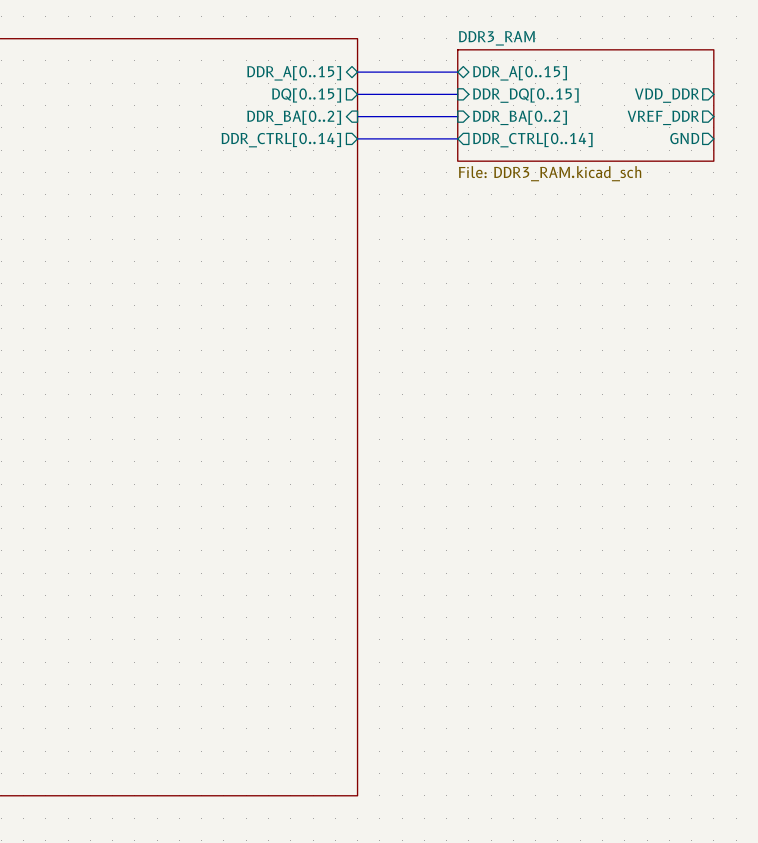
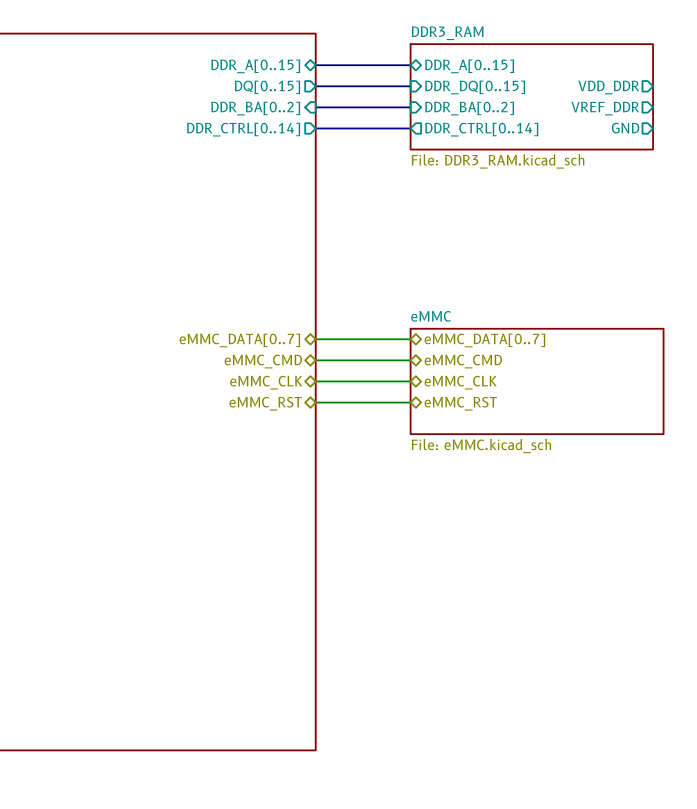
wire: none -> (315, 339) (410, 339)
hierarchical label: none -> eMMC_DATA[0..7] (239, 340)
hierarchical label: none -> eMMC_DATA[0..7] (485, 340)
wire: none -> (315, 360) (410, 360)
hierarchical label: none -> eMMC_CMD (263, 361)
hierarchical label: none -> eMMC_CMD (463, 361)
wire: none -> (315, 381) (410, 381)
sheet eMMC: none -> File: eMMC.kicad_sch (537, 381)
hierarchical label: none -> eMMC_CLK (266, 382)
hierarchical label: none -> eMMC_CLK (460, 382)
wire: none -> (315, 402) (410, 402)
hierarchical label: none -> eMMC_RST (265, 403)
hierarchical label: none -> eMMC_RST (460, 403)

